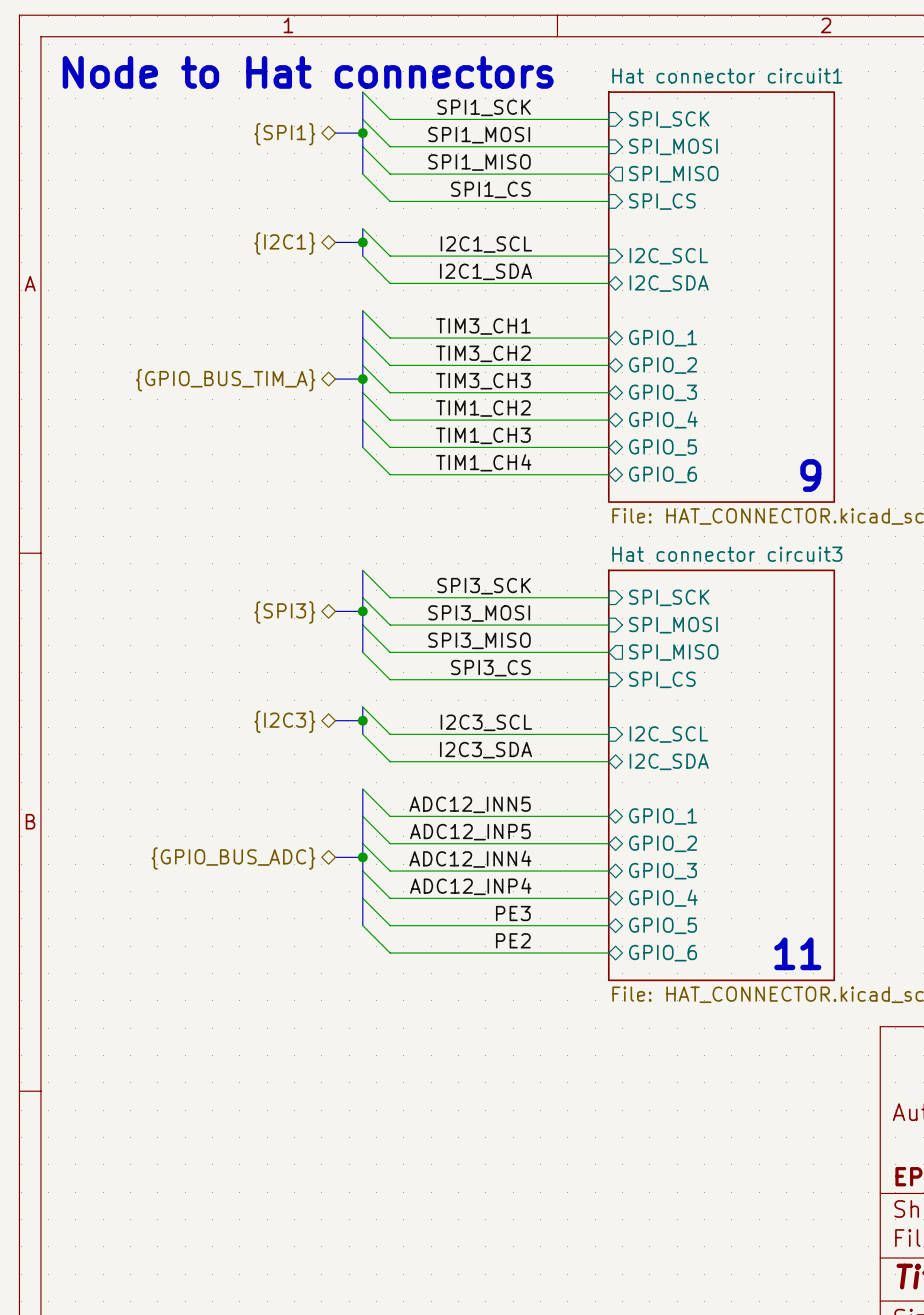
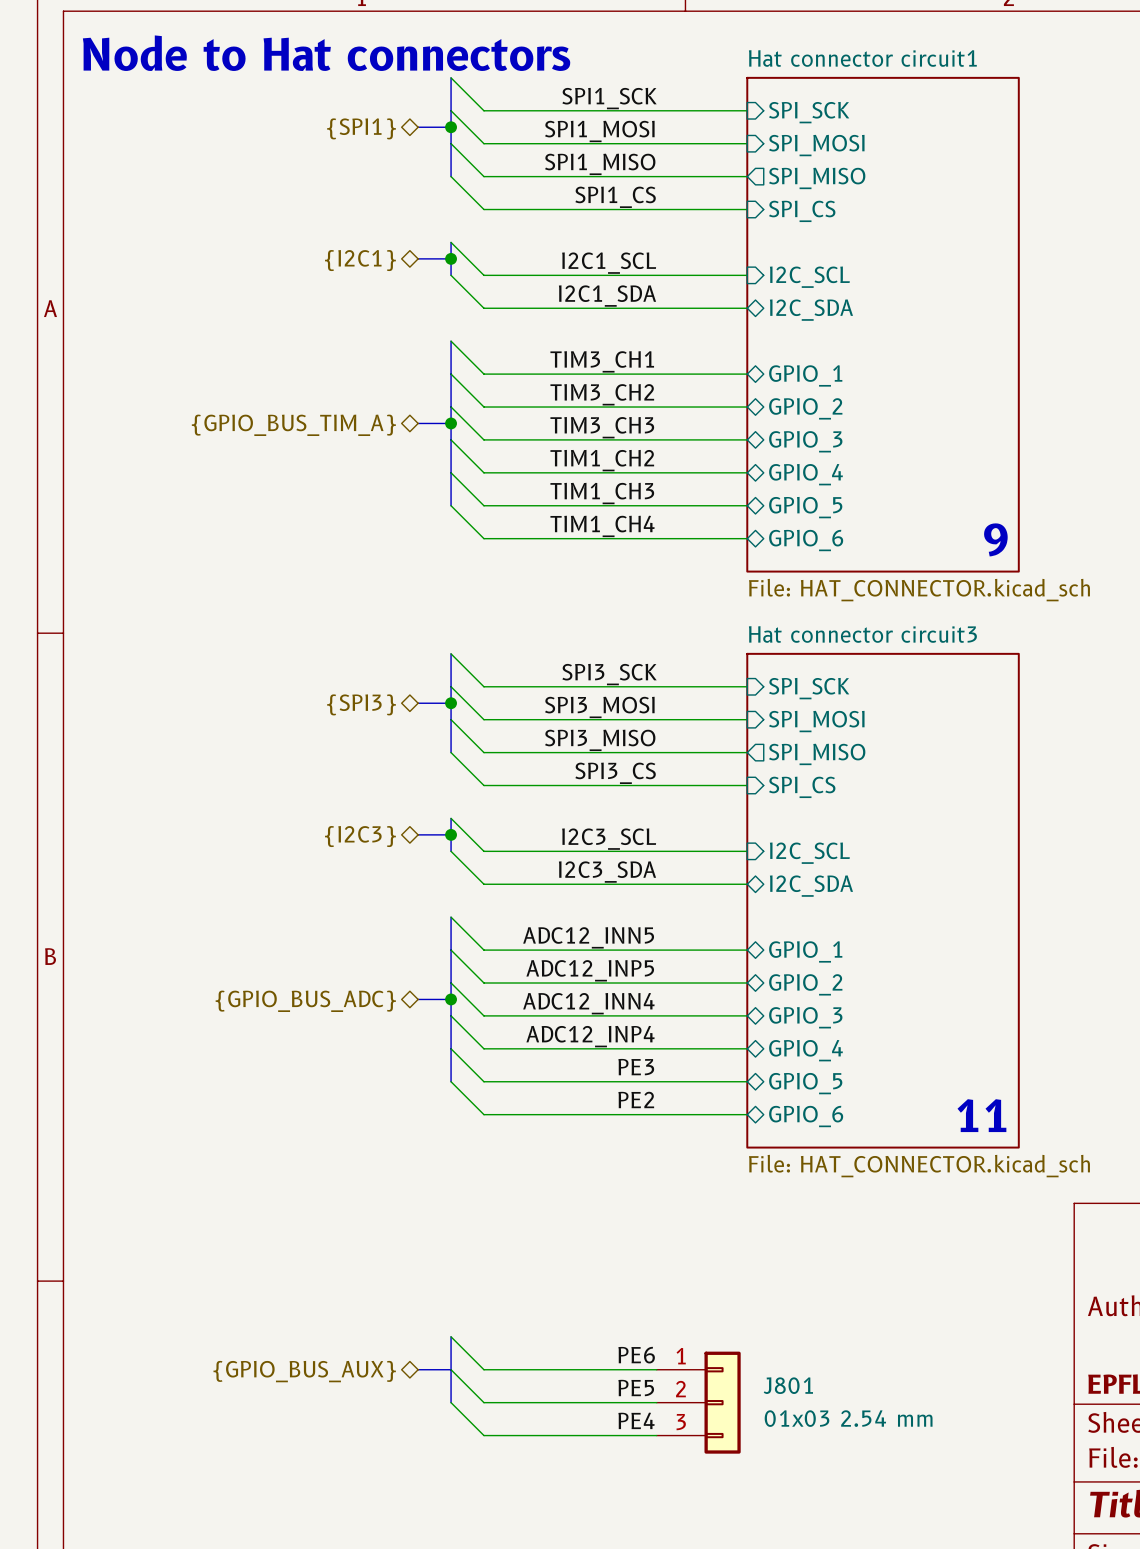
wire: none -> (451, 1336) (483, 1369) (656, 1369)
bus: none -> (451, 1336) (451, 1402)
label: none -> PE6 (636, 1355)
bus: none -> (418, 1369) (451, 1369)
wire: none -> (451, 1369) (483, 1402) (656, 1402)
hierarchical label: none -> {GPIO_BUS_AUX} (304, 1371)
label: none -> PE5 (636, 1388)
wire: none -> (451, 1402) (483, 1435) (656, 1435)
J801: none -> 01x03 2.54 mm (698, 1402)
label: none -> PE4 (636, 1420)

